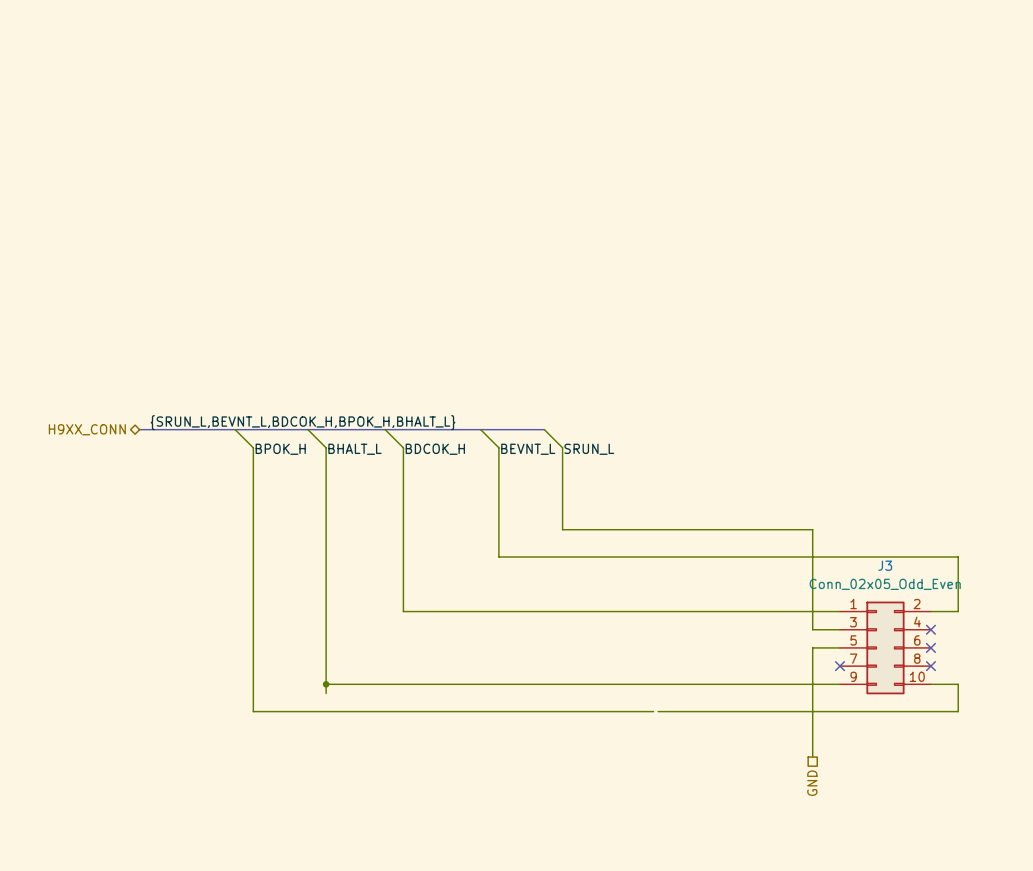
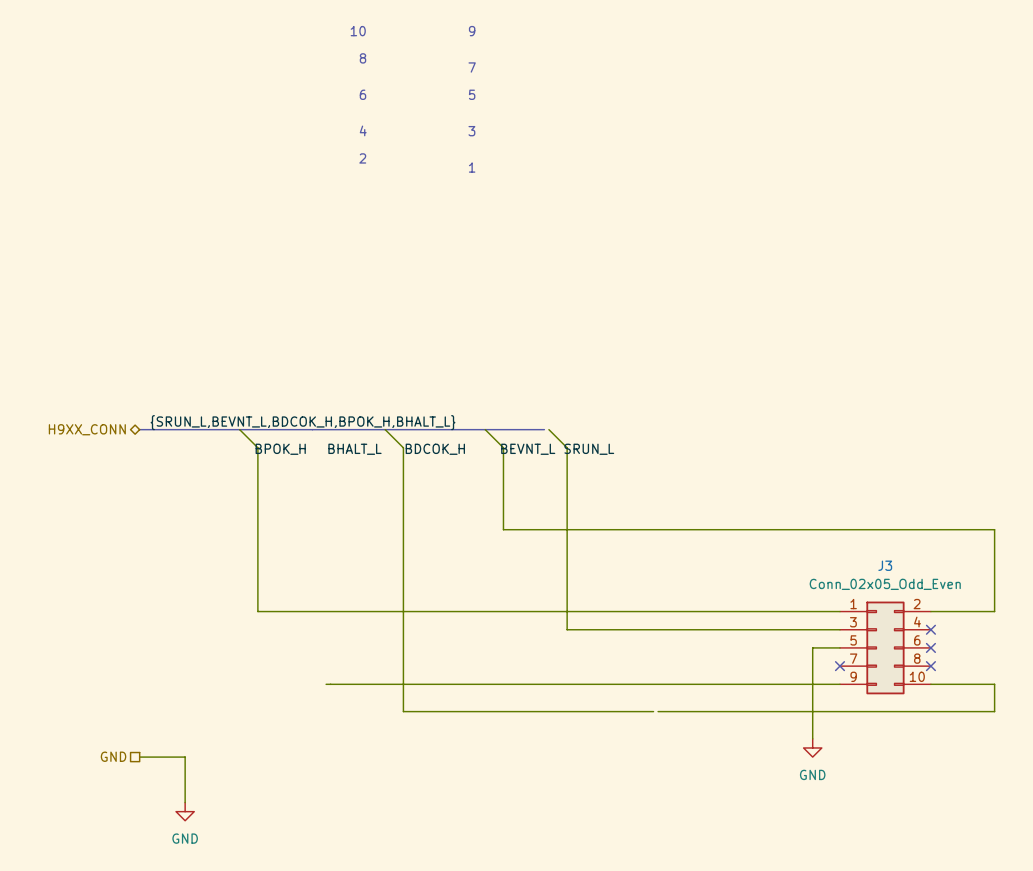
text: none -> 10 (358, 31)
text: none -> 9 (472, 31)
text: none -> 8 (362, 58)
text: none -> 7 (472, 67)
text: none -> 6 (362, 94)
text: none -> 5 (472, 94)
text: none -> 4 (363, 130)
text: none -> 3 (471, 131)
text: none -> 2 (362, 158)
text: none -> 1 (472, 167)
wire: (235, 429) (253, 447) (253, 711) (403, 711) -> (239, 429) (257, 447) (257, 611) (403, 611) (403, 711)
wire: (307, 429) (326, 447) (326, 693) -> none
wire: (480, 429) (498, 447) (498, 556) (958, 556) (958, 611) -> none
wire: (544, 429) (562, 447) (562, 529) -> (485, 429) (503, 447) (503, 529) (562, 529)
wire: none -> (548, 429) (567, 447) (567, 629) (812, 629)
wire: (812, 529) (812, 629) -> (812, 529) (994, 529) (994, 611) (958, 611)
junction: (326, 684) -> none
wire: (958, 684) (958, 711) -> (958, 684) (994, 684) (994, 711) (958, 711)
power symbol: none -> GND (812, 747)
hierarchical label: none -> GND (113, 756)
wire: none -> (139, 757) (185, 757) (185, 802)
hierarchical label: GND (812, 783) -> none
power symbol: none -> GND (185, 811)

